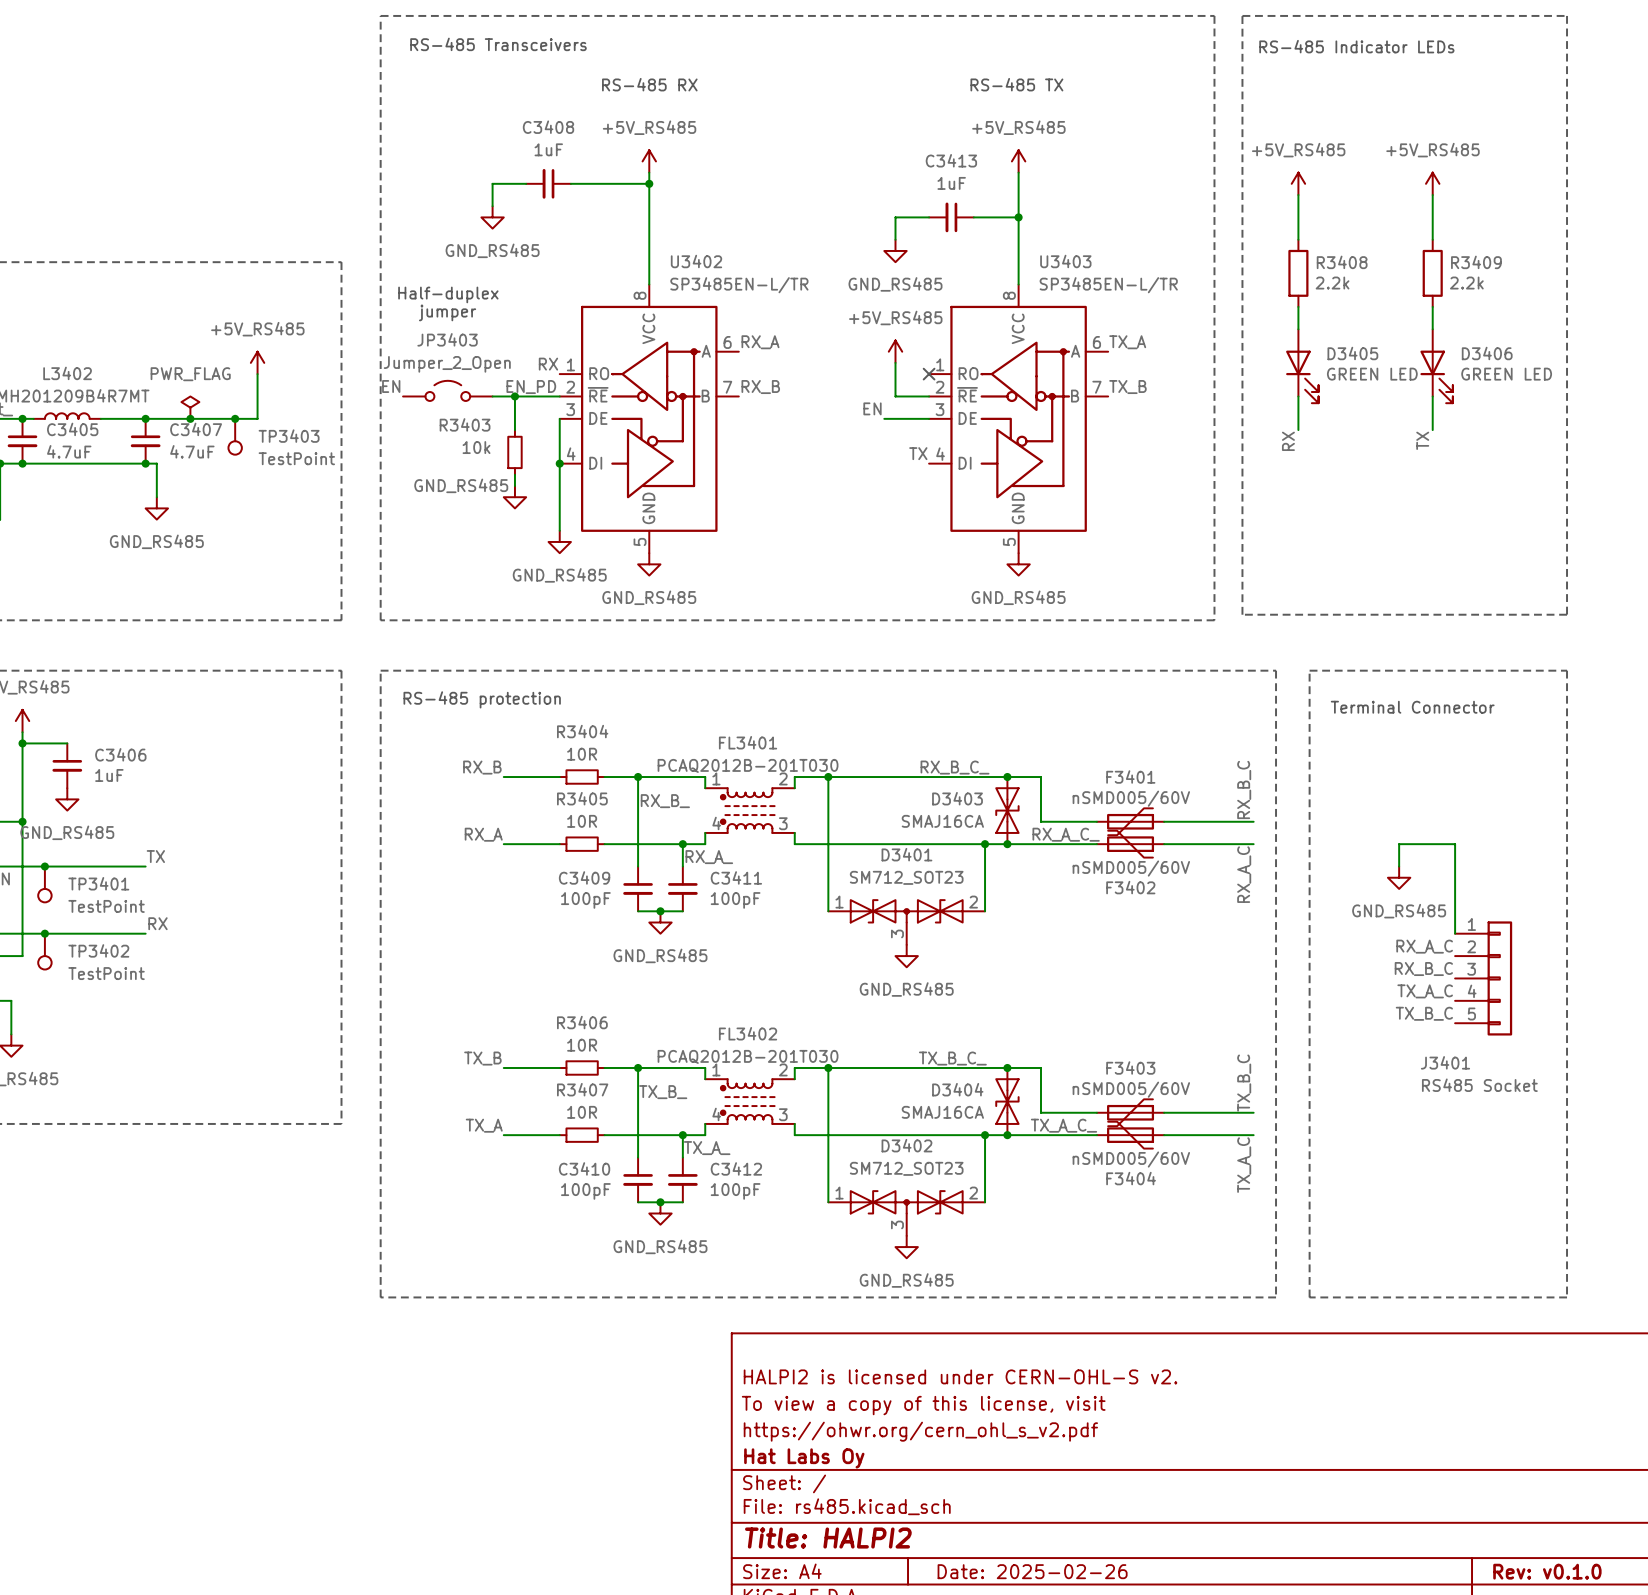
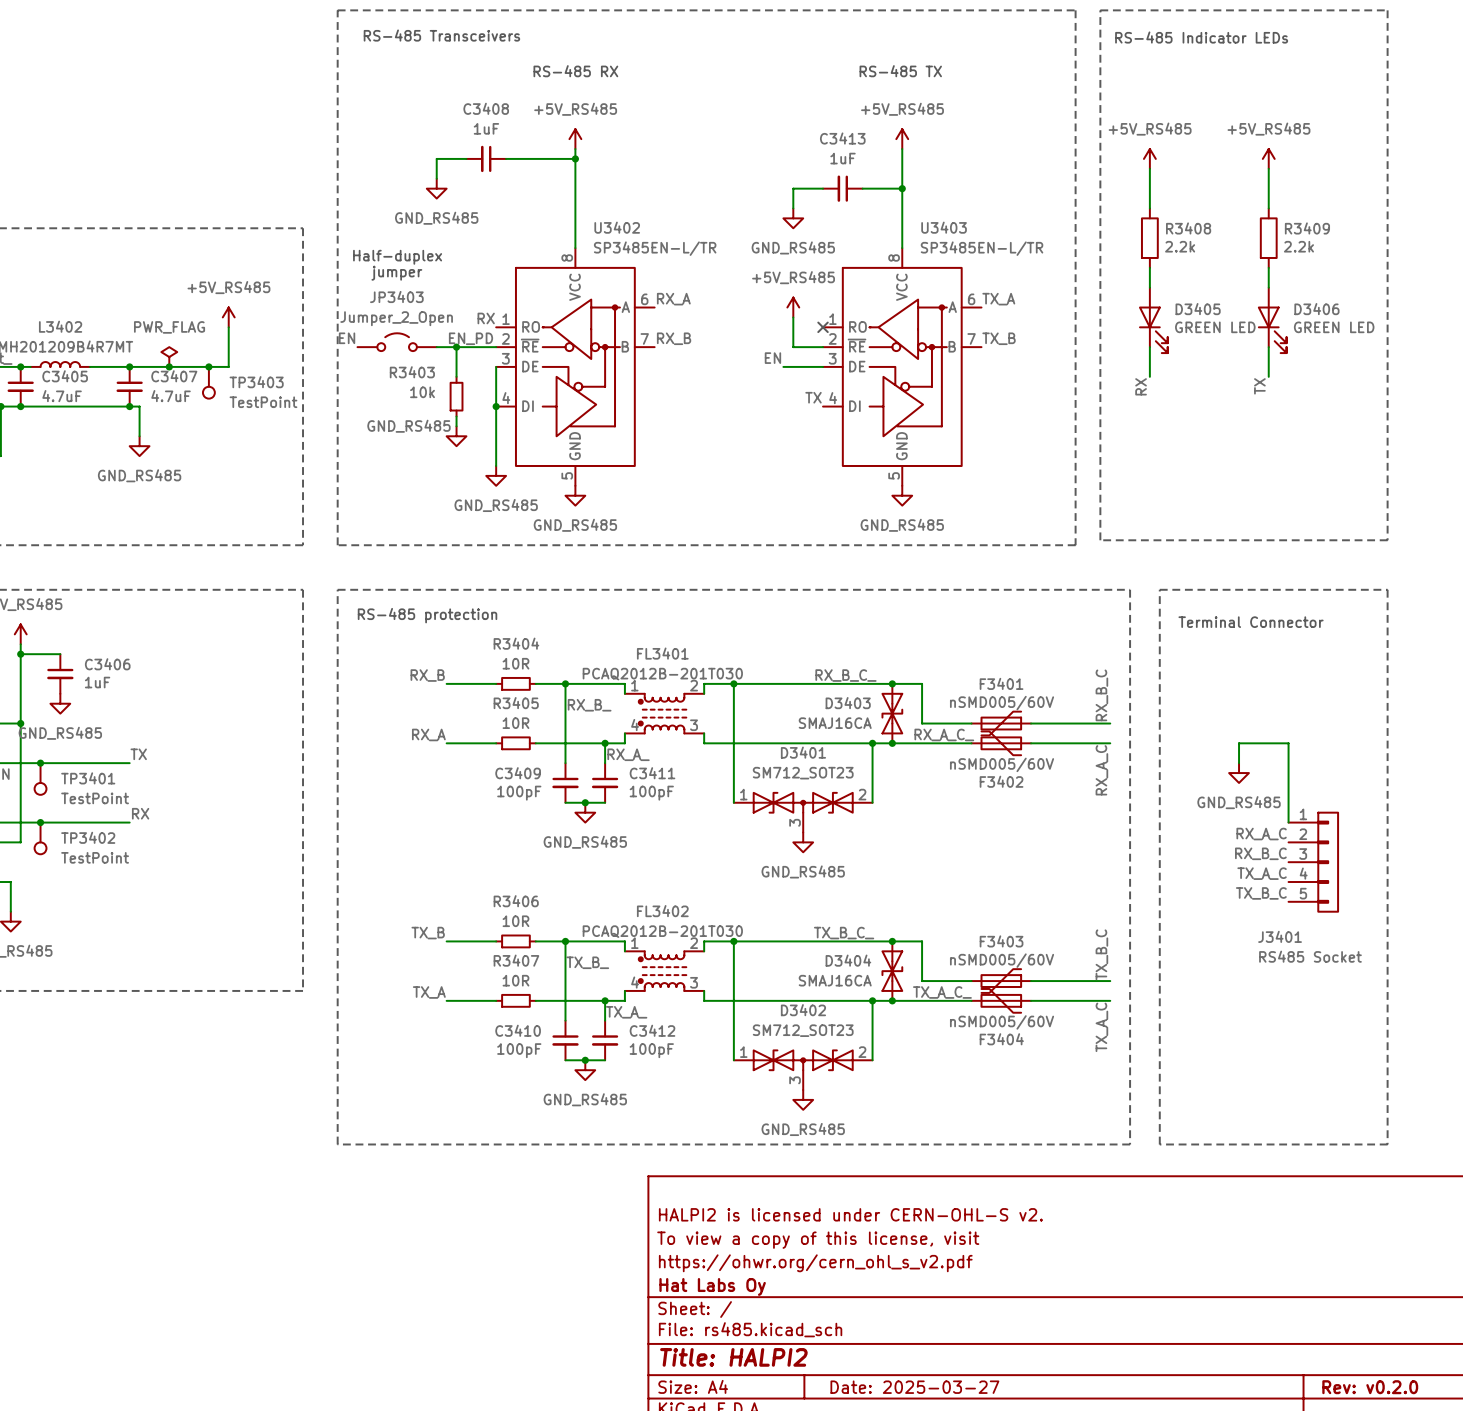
title block: Date: 2025-02-26 (1032, 1571) -> Date: 2025-03-27 (914, 1387)
title block: Rev: v0.1.0 (1547, 1571) -> Rev: v0.2.0 (1370, 1387)

